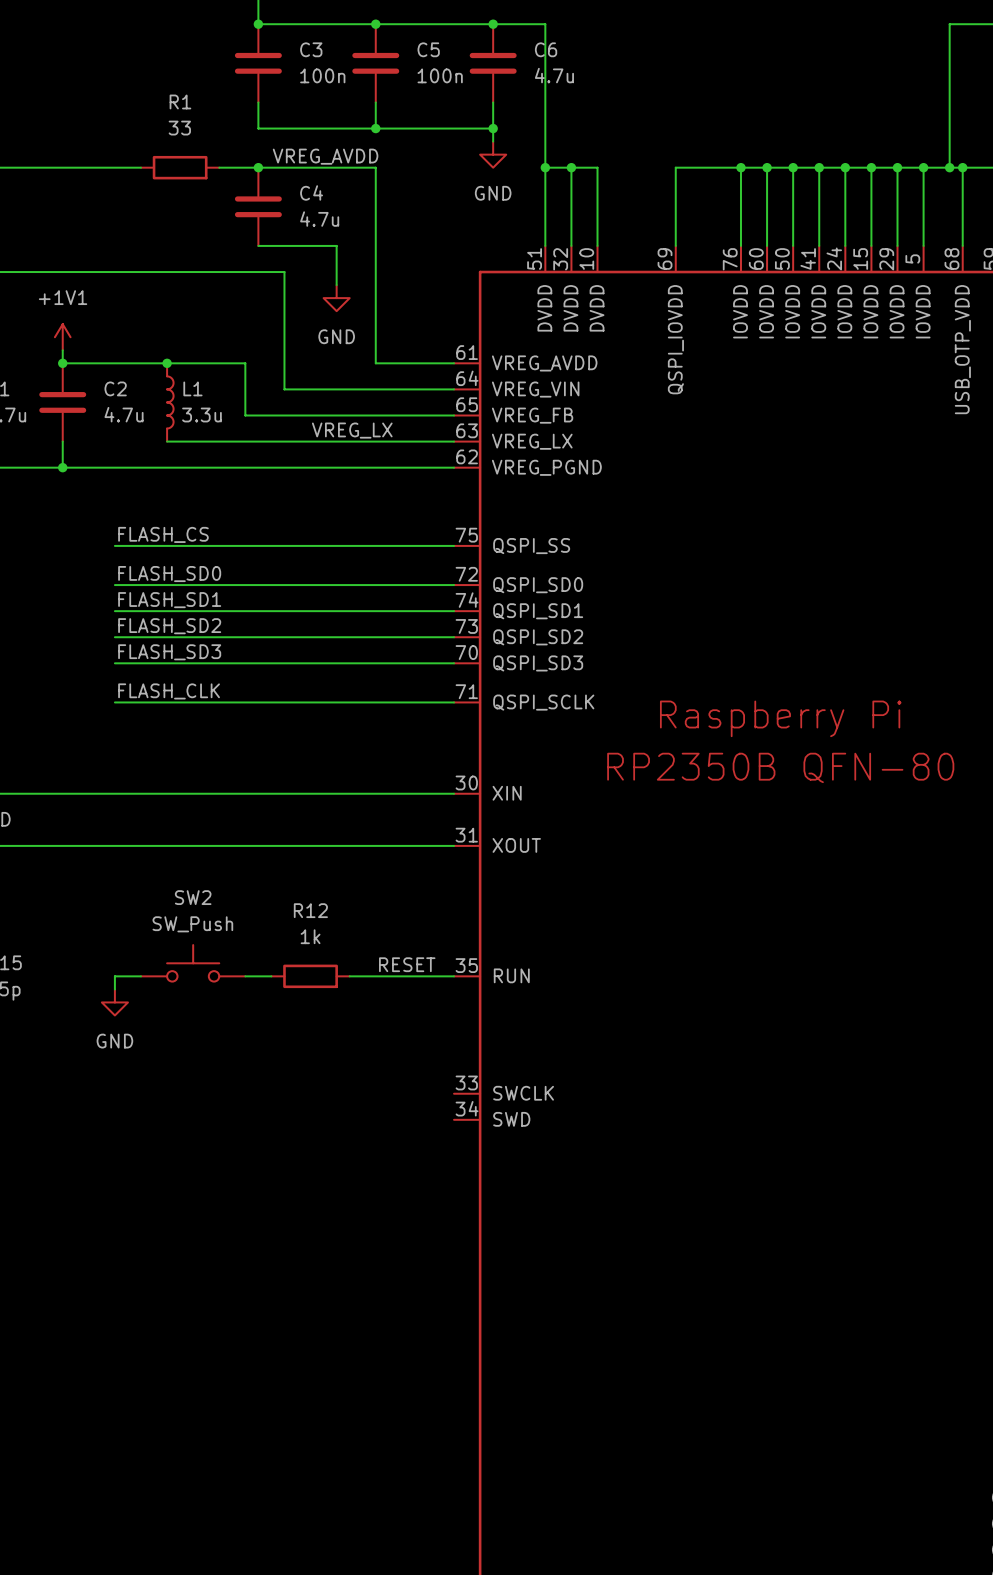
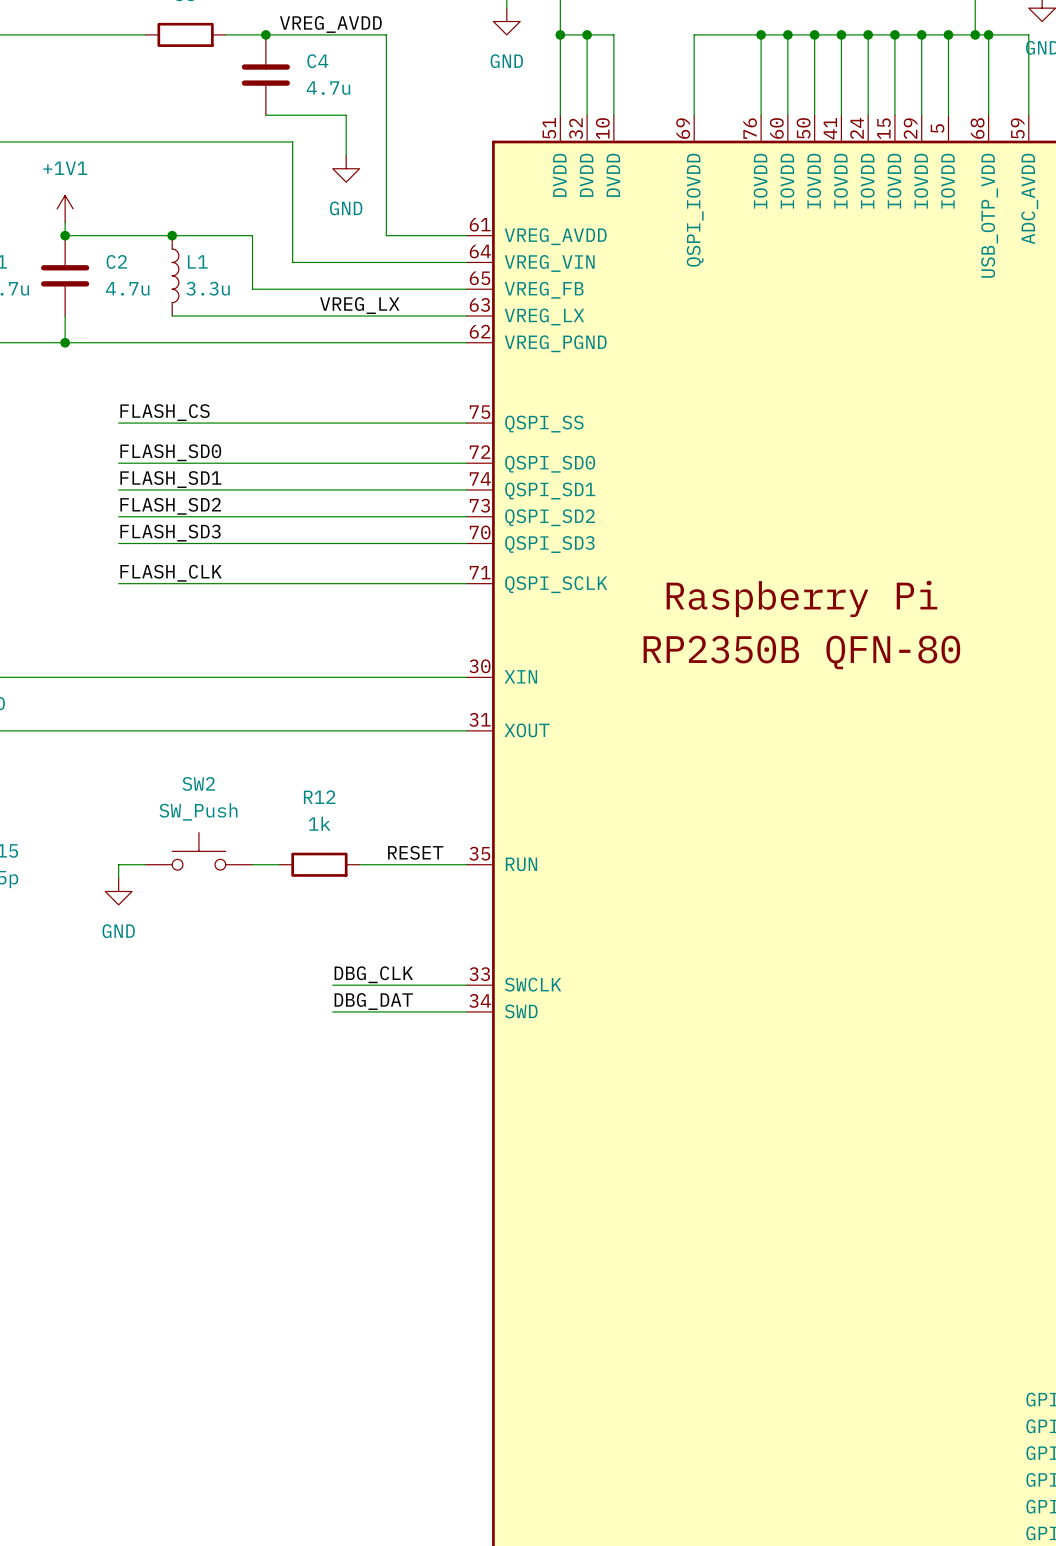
label: none -> DBG_CLK (373, 974)
wire: none -> (332, 985) (466, 985)
label: none -> DBG_DAT (373, 1001)
wire: none -> (332, 1011) (466, 1011)

